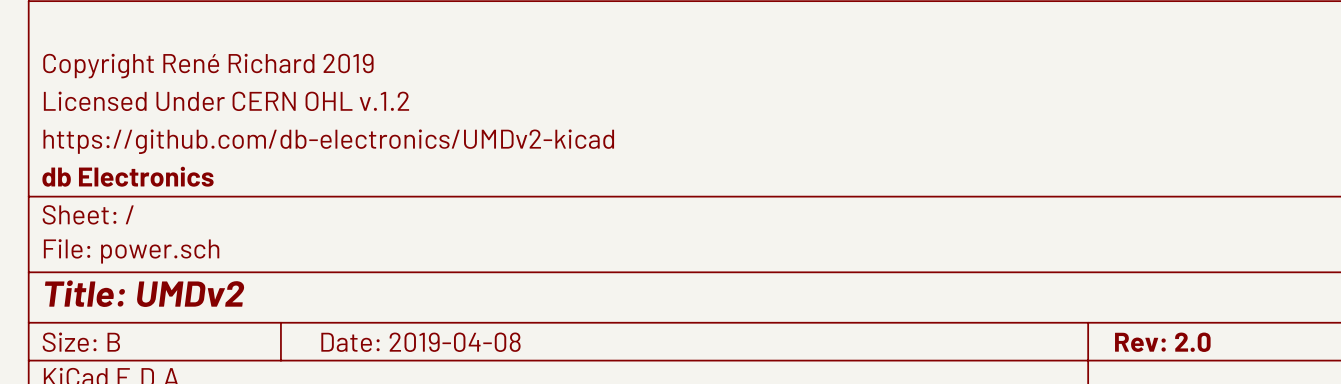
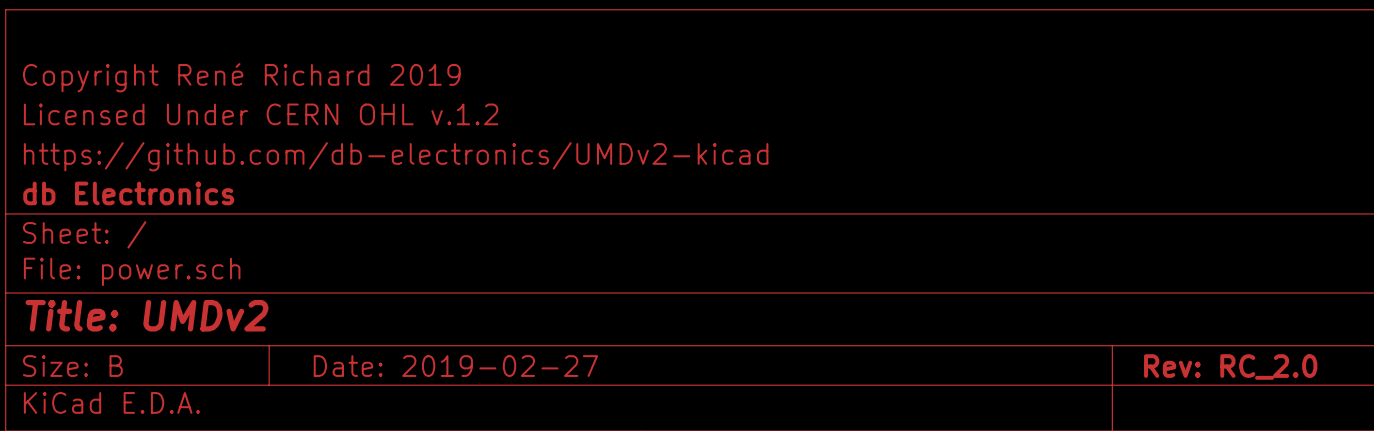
title block: Date: 2019-04-08 (420, 342) -> Date: 2019-02-27 (455, 366)
title block: Rev: 2.0 (1162, 342) -> Rev: RC_2.0 (1230, 366)

